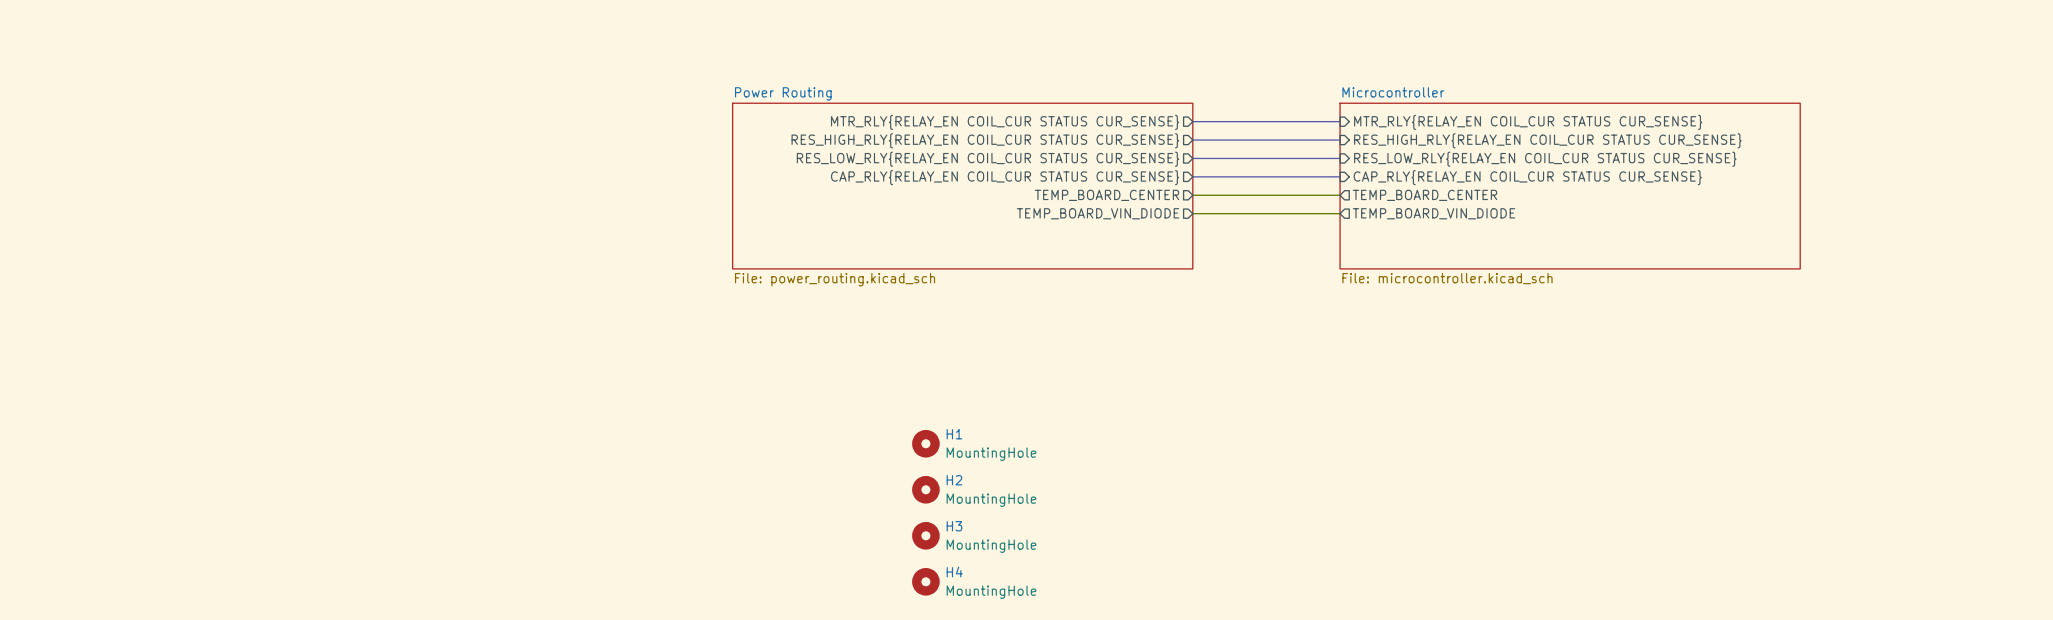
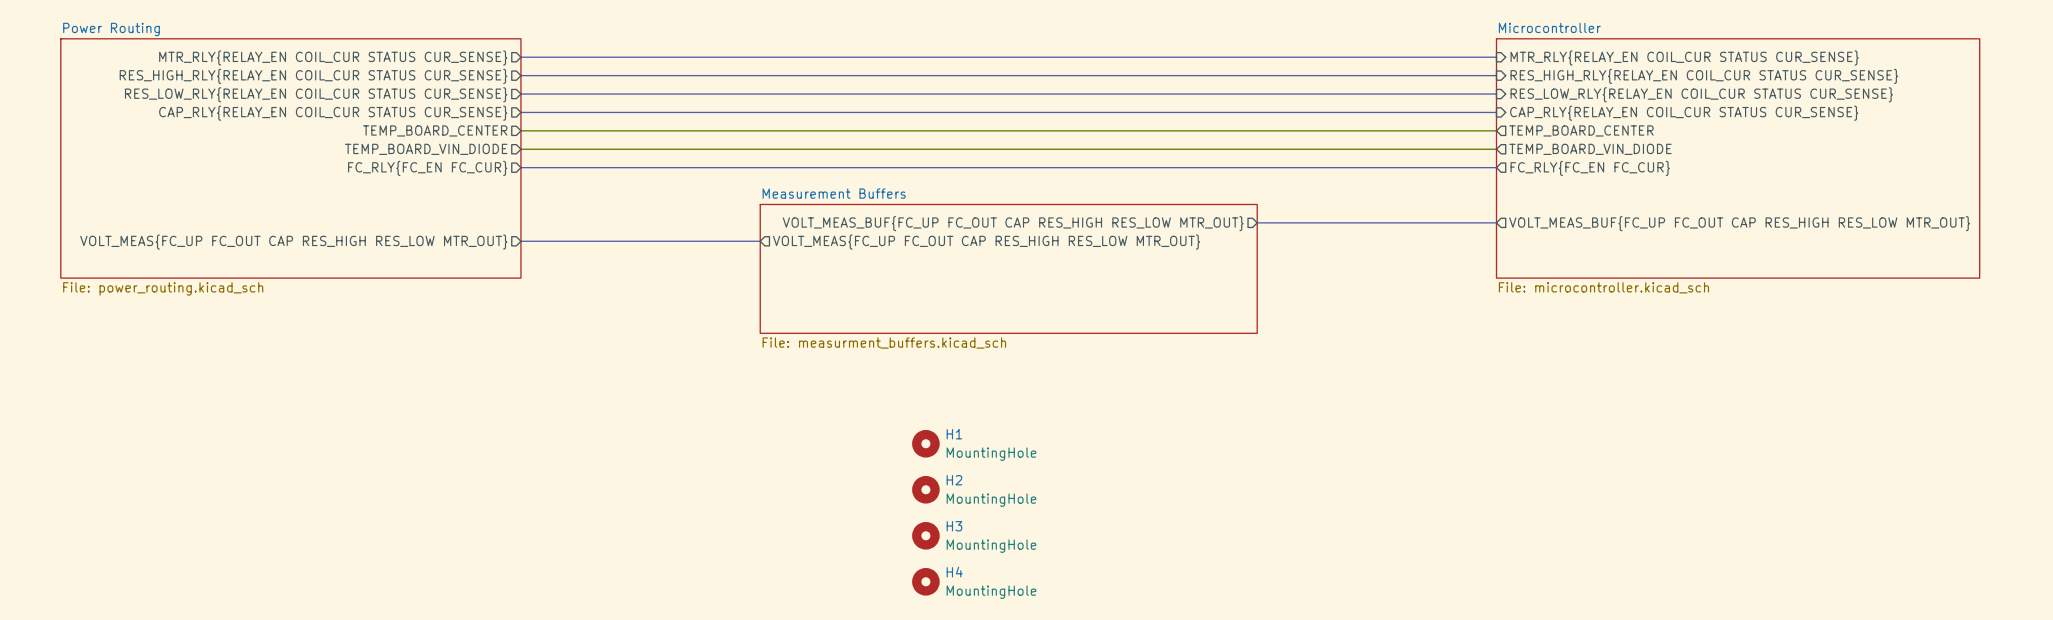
sheet pin: none -> MTR_RLY{RELAY_EN COIL_CUR STATUS CUR_SENSE} (333, 57)
bus: none -> (520, 57) (1496, 57)
sheet pin: none -> MTR_RLY{RELAY_EN COIL_CUR STATUS CUR_SENSE} (1684, 57)
bus: none -> (520, 75) (1496, 75)
sheet pin: none -> RES_HIGH_RLY{RELAY_EN COIL_CUR STATUS CUR_SENSE} (313, 76)
sheet pin: none -> RES_HIGH_RLY{RELAY_EN COIL_CUR STATUS CUR_SENSE} (1704, 76)
sheet pin: none -> RES_LOW_RLY{RELAY_EN COIL_CUR STATUS CUR_SENSE} (316, 94)
bus: none -> (520, 94) (1496, 94)
sheet pin: none -> RES_LOW_RLY{RELAY_EN COIL_CUR STATUS CUR_SENSE} (1701, 94)
bus: none -> (520, 112) (1496, 112)
sheet pin: none -> CAP_RLY{RELAY_EN COIL_CUR STATUS CUR_SENSE} (333, 113)
bus: (1192, 121) (1340, 121) -> none
sheet pin: MTR_RLY{RELAY_EN COIL_CUR STATUS CUR_SENSE} (1005, 122) -> none
sheet pin: MTR_RLY{RELAY_EN COIL_CUR STATUS CUR_SENSE} (1528, 122) -> CAP_RLY{RELAY_EN COIL_CUR STATUS CUR_SENSE} (1684, 113)
sheet pin: none -> TEMP_BOARD_CENTER (435, 130)
wire: none -> (520, 130) (1496, 130)
sheet pin: none -> TEMP_BOARD_CENTER (1581, 130)
sheet pin: RES_HIGH_RLY{RELAY_EN COIL_CUR STATUS CUR_SENSE} (985, 140) -> none
bus: (1192, 140) (1340, 140) -> none
sheet pin: RES_HIGH_RLY{RELAY_EN COIL_CUR STATUS CUR_SENSE} (1547, 140) -> none
sheet pin: none -> TEMP_BOARD_VIN_DIODE (426, 149)
wire: none -> (520, 149) (1496, 149)
sheet pin: none -> TEMP_BOARD_VIN_DIODE (1590, 149)
sheet Power Routing: none -> File: power_routing.kicad_sch (290, 158)
bus: (1192, 158) (1340, 158) -> none
sheet Microcontroller: none -> File: microcontroller.kicad_sch (1738, 158)
sheet pin: RES_LOW_RLY{RELAY_EN COIL_CUR STATUS CUR_SENSE} (987, 159) -> none
sheet pin: RES_LOW_RLY{RELAY_EN COIL_CUR STATUS CUR_SENSE} (1545, 159) -> none
bus: none -> (520, 167) (1496, 167)
sheet pin: none -> FC_RLY{FC_EN FC_CUR} (427, 168)
sheet pin: none -> FC_RLY{FC_EN FC_CUR} (1590, 168)
bus: (1192, 176) (1340, 176) -> none
sheet pin: CAP_RLY{RELAY_EN COIL_CUR STATUS CUR_SENSE} (1005, 177) -> none
sheet pin: CAP_RLY{RELAY_EN COIL_CUR STATUS CUR_SENSE} (1527, 177) -> none
sheet Power Routing: File: power_routing.kicad_sch (962, 186) -> none
sheet Microcontroller: File: microcontroller.kicad_sch (1570, 186) -> none
sheet pin: TEMP_BOARD_CENTER (1106, 195) -> none
wire: (1192, 195) (1340, 195) -> none
sheet pin: TEMP_BOARD_CENTER (1424, 195) -> none
sheet pin: TEMP_BOARD_VIN_DIODE (1097, 213) -> none
wire: (1192, 213) (1340, 213) -> none
sheet pin: TEMP_BOARD_VIN_DIODE (1433, 213) -> none
bus: none -> (1257, 222) (1496, 222)
sheet pin: none -> VOLT_MEAS_BUF{FC_UP FC_OUT CAP RES_HIGH RES_LOW MTR_OUT} (1013, 223)
sheet pin: none -> VOLT_MEAS_BUF{FC_UP FC_OUT CAP RES_HIGH RES_LOW MTR_OUT} (1739, 223)
bus: none -> (520, 241) (760, 241)
sheet pin: none -> VOLT_MEAS{FC_UP FC_OUT CAP RES_HIGH RES_LOW MTR_OUT} (293, 242)
sheet pin: none -> VOLT_MEAS{FC_UP FC_OUT CAP RES_HIGH RES_LOW MTR_OUT} (986, 242)
sheet Measurement Buffers: none -> File: measurment_buffers.kicad_sch (1008, 268)

